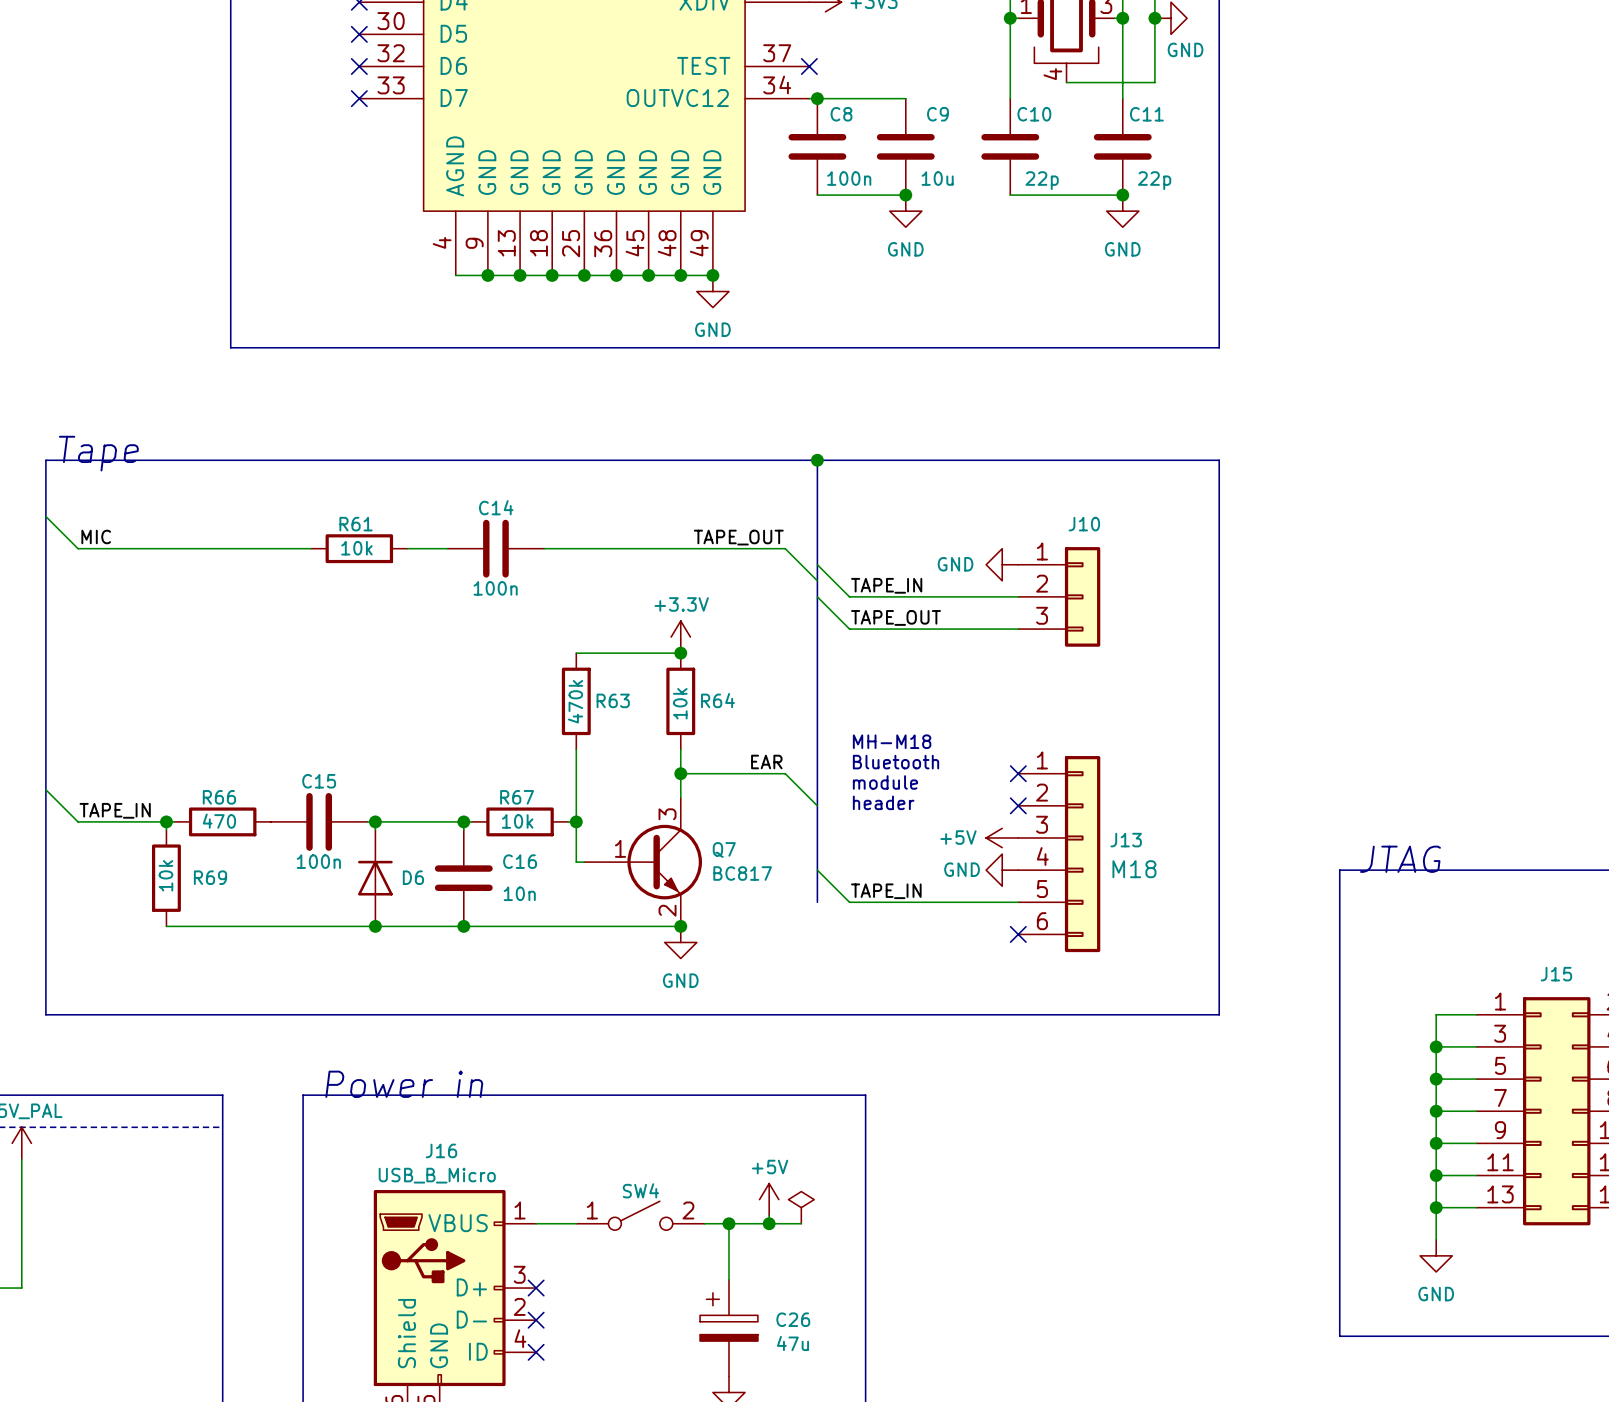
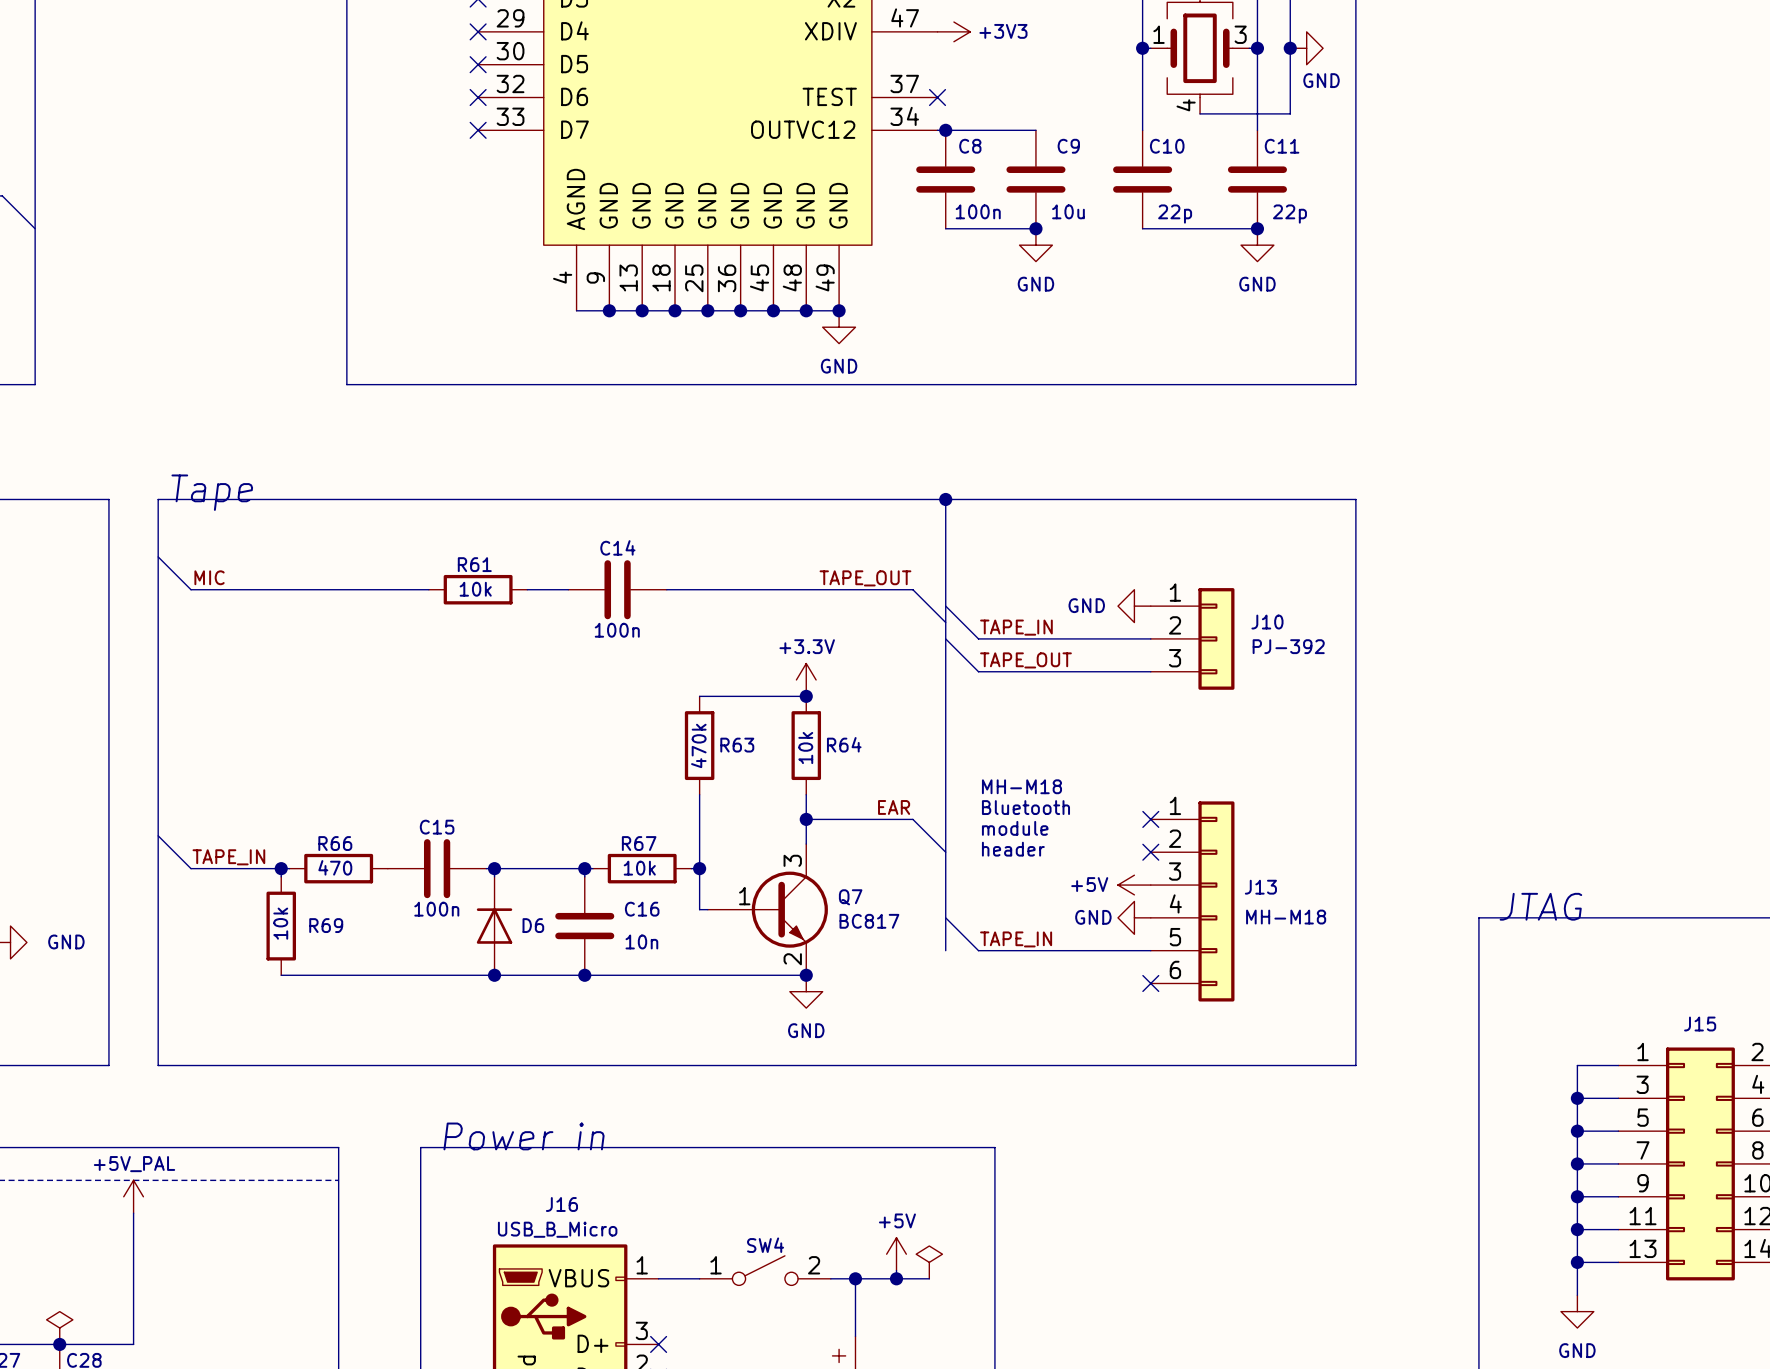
J10 name position: J10 (1084, 524) -> J10 (1267, 622)
J10 value: none -> PJ-392 (1288, 646)
J13 text: M18 (1134, 869) -> none
J13 value: none -> MH-M18 (1286, 917)

